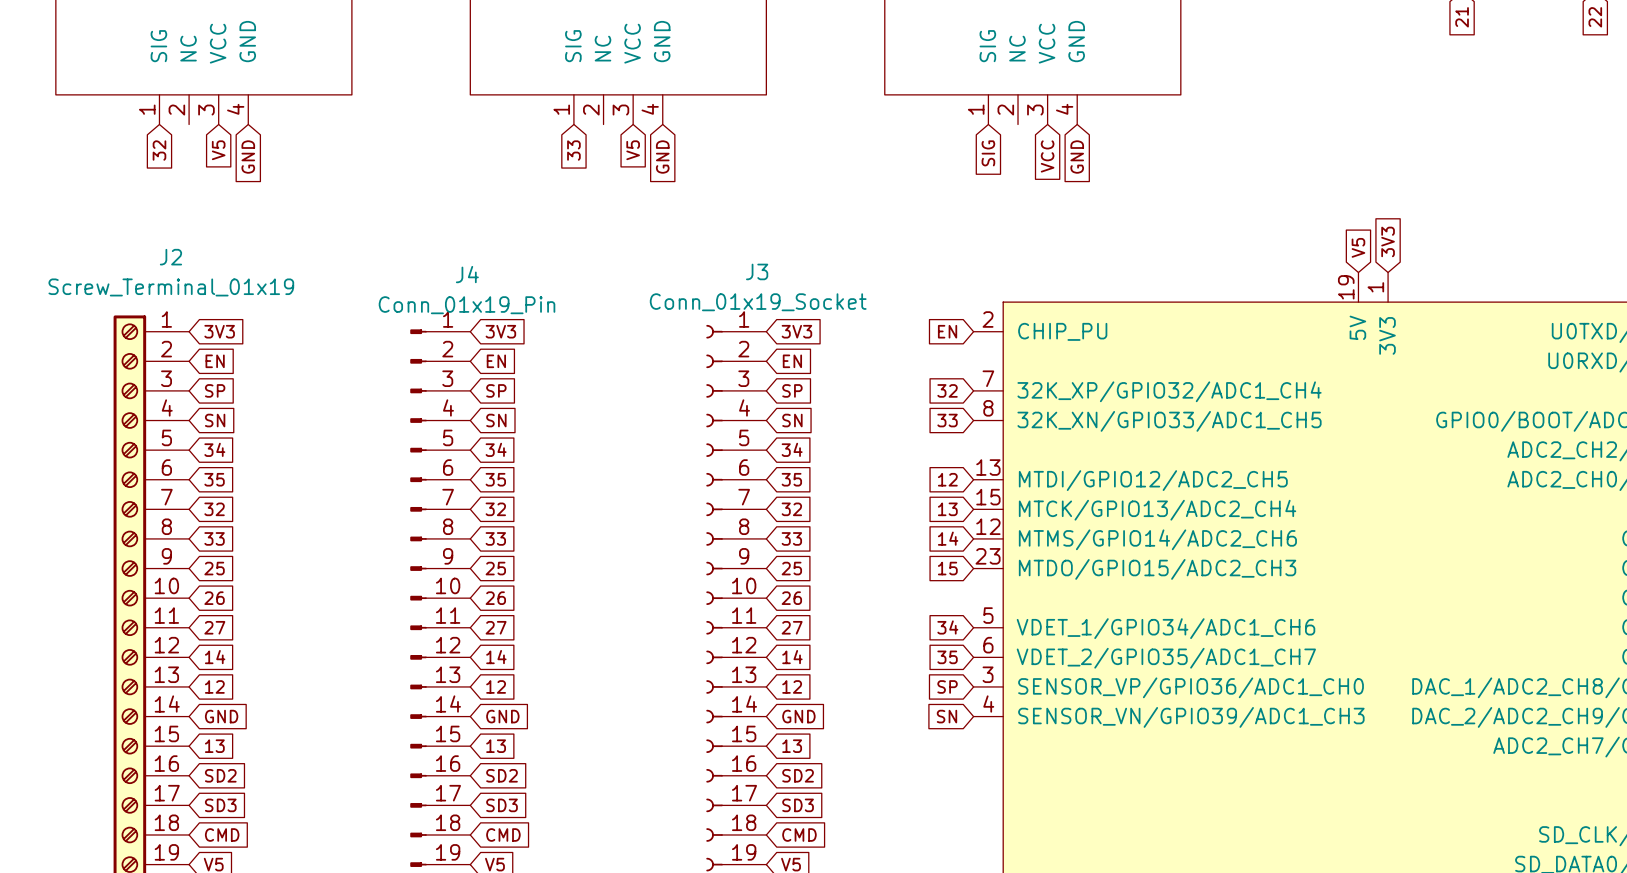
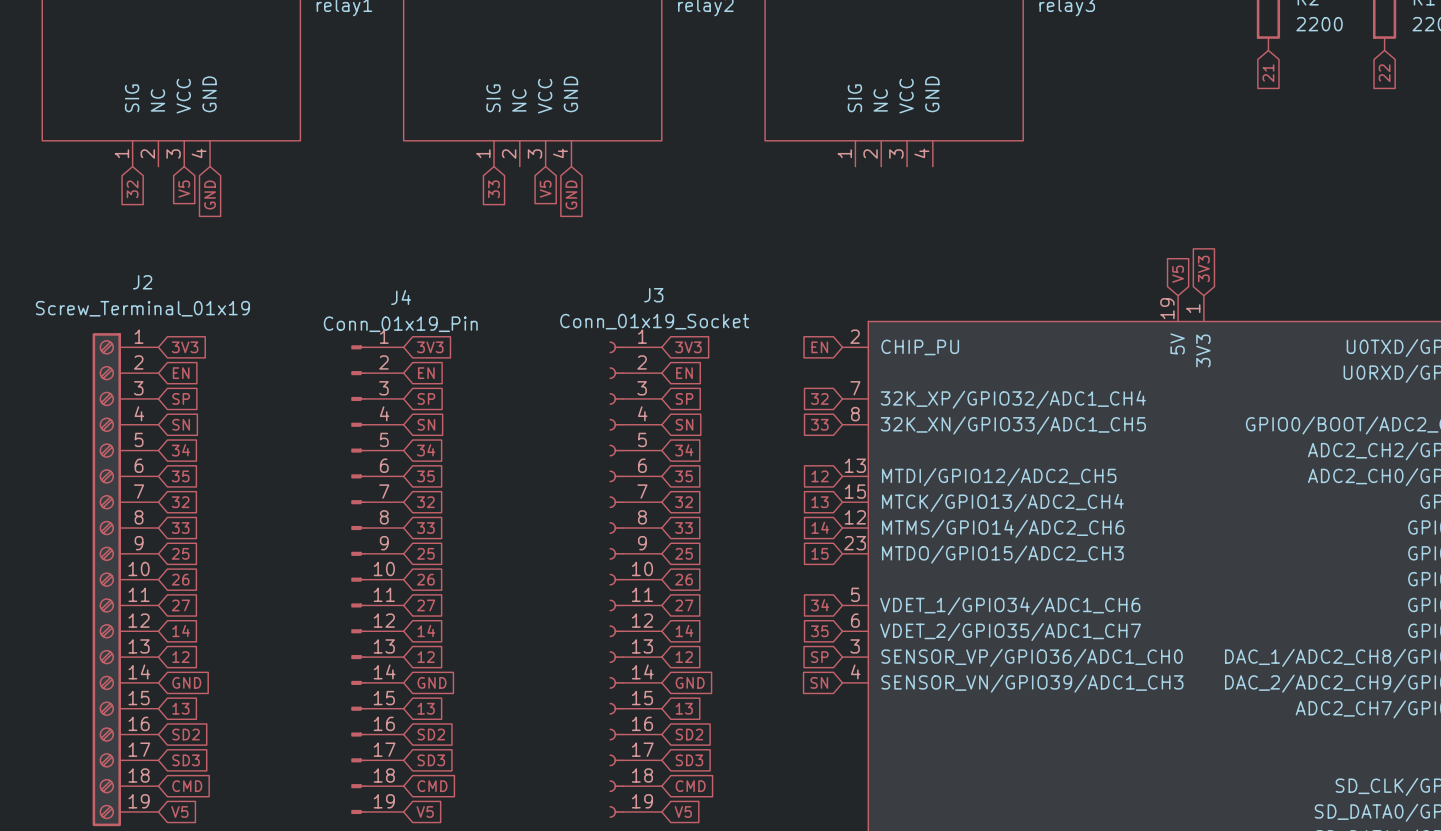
global label: SIG (988, 153) -> none
global label: VCC (1047, 156) -> none
global label: GND (1077, 157) -> none

